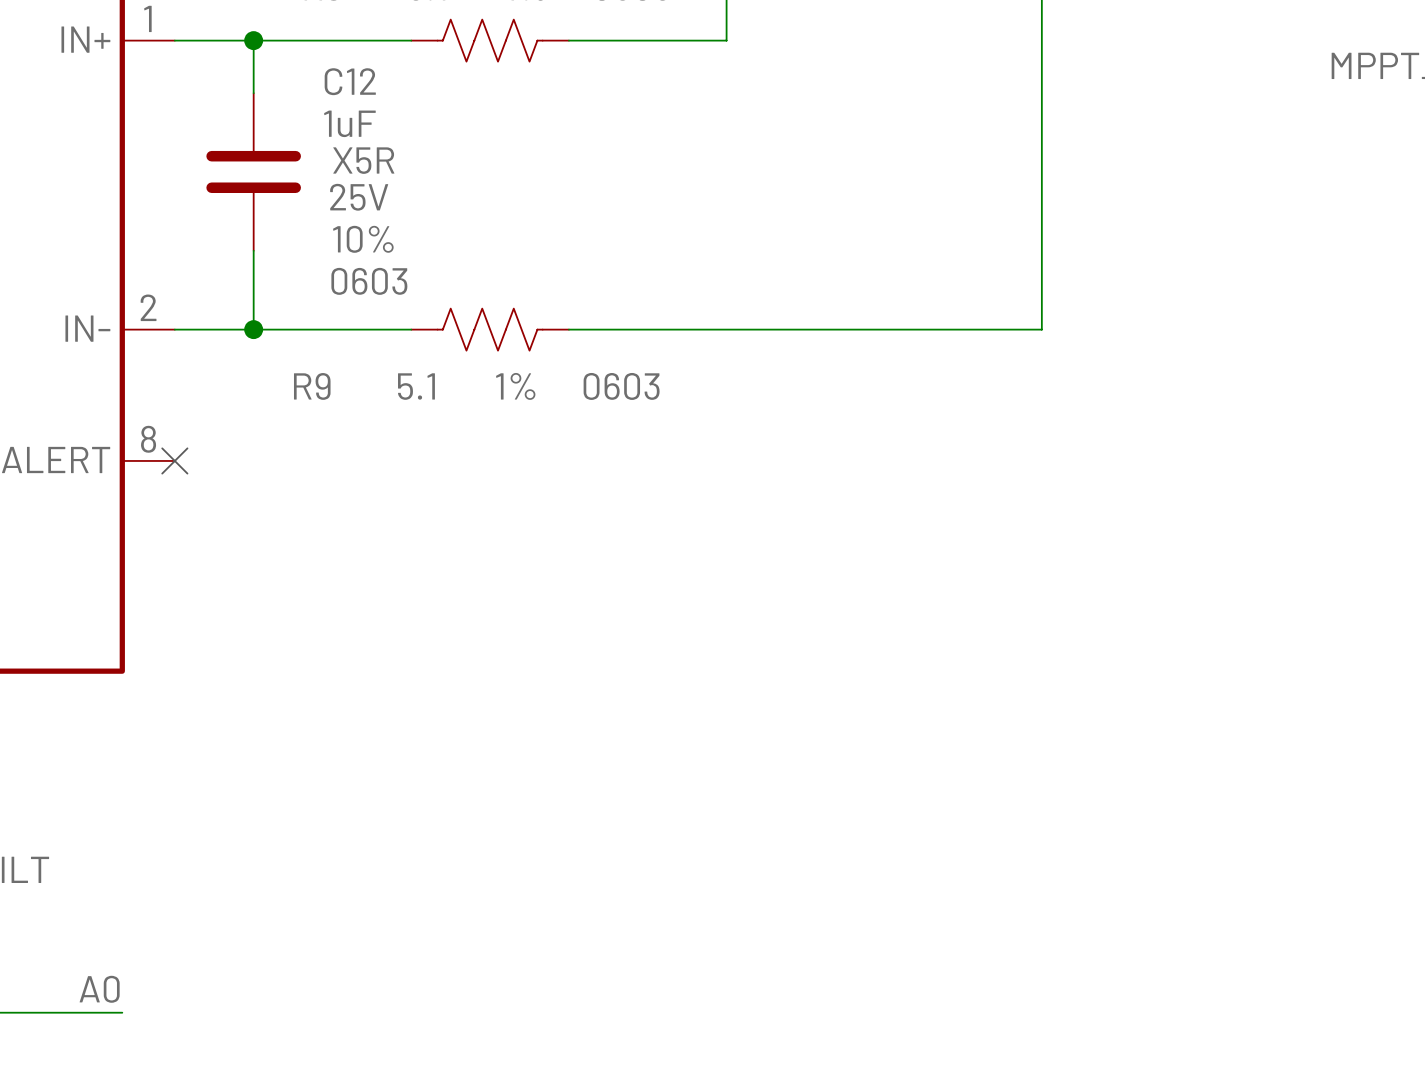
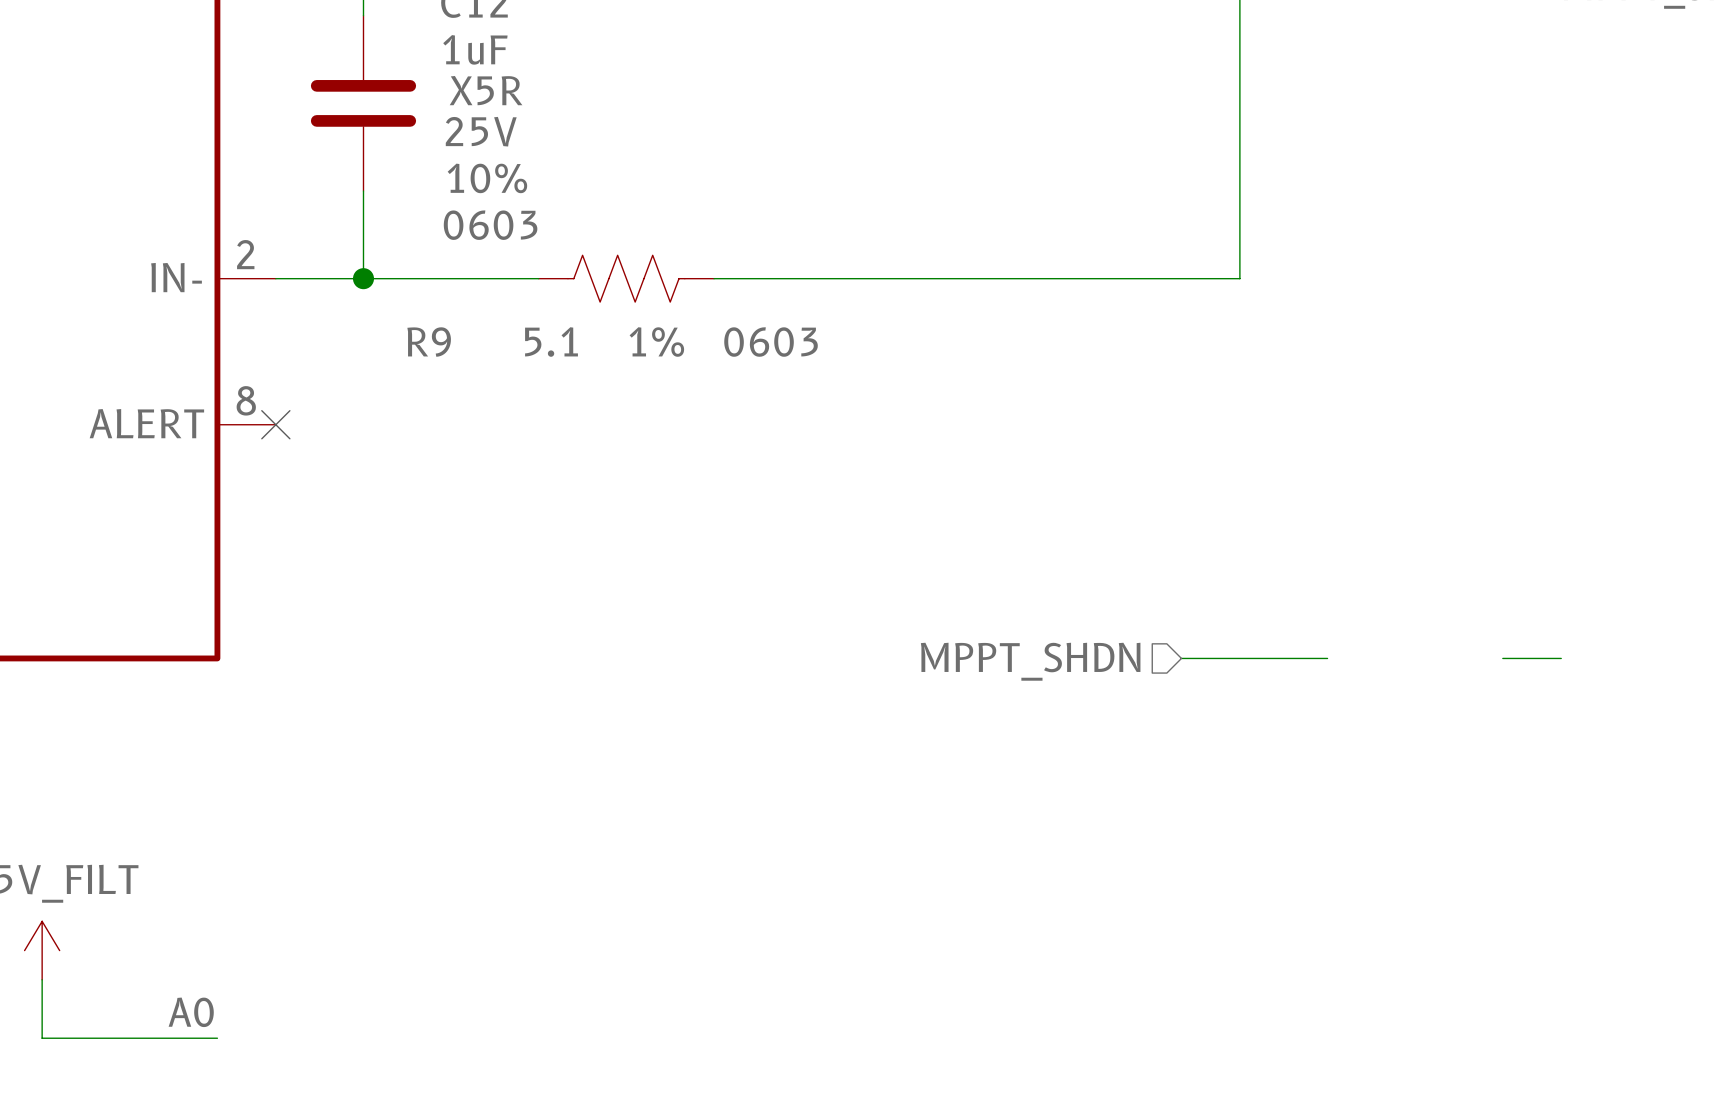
hierarchical label: none -> MPPT_SHDN (1030, 661)
wire: none -> (1181, 658) (1327, 658)
wire: none -> (1502, 658) (1561, 658)

